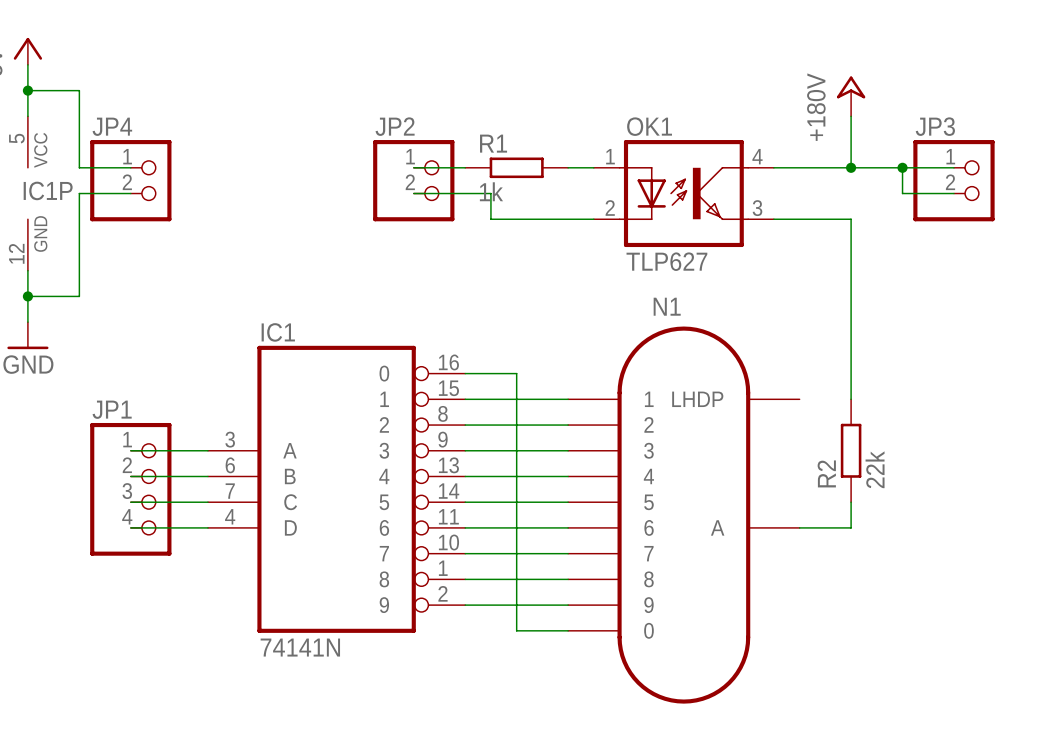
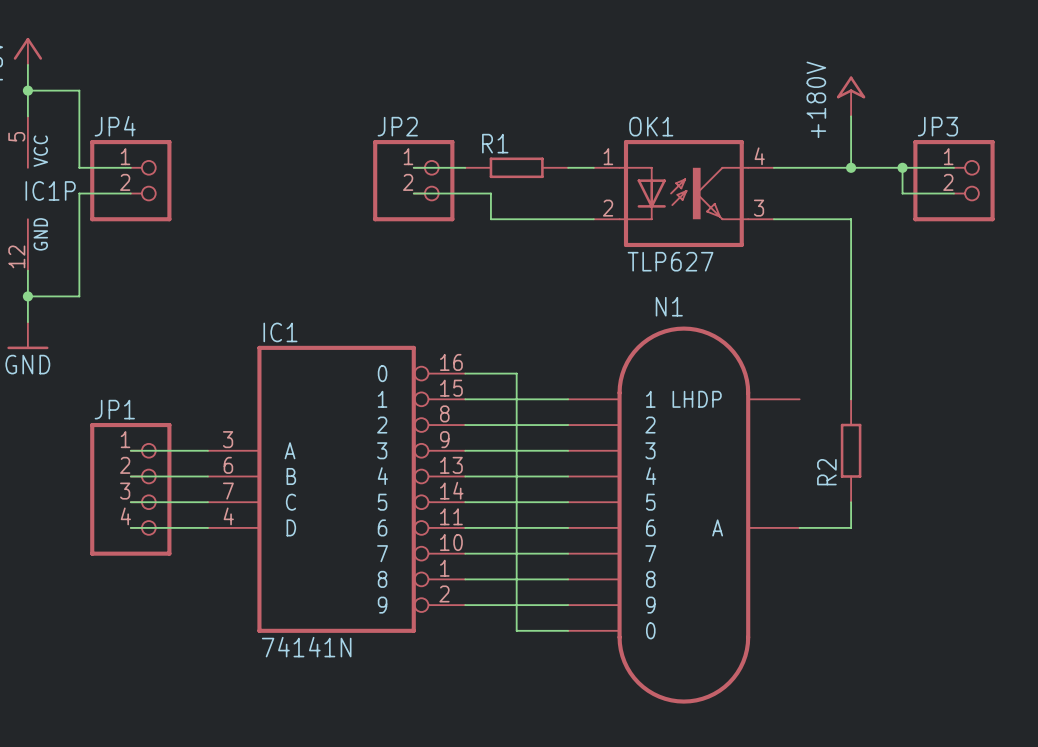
R1 value: 1k (491, 191) -> none
R2 value: 22k (875, 469) -> none

